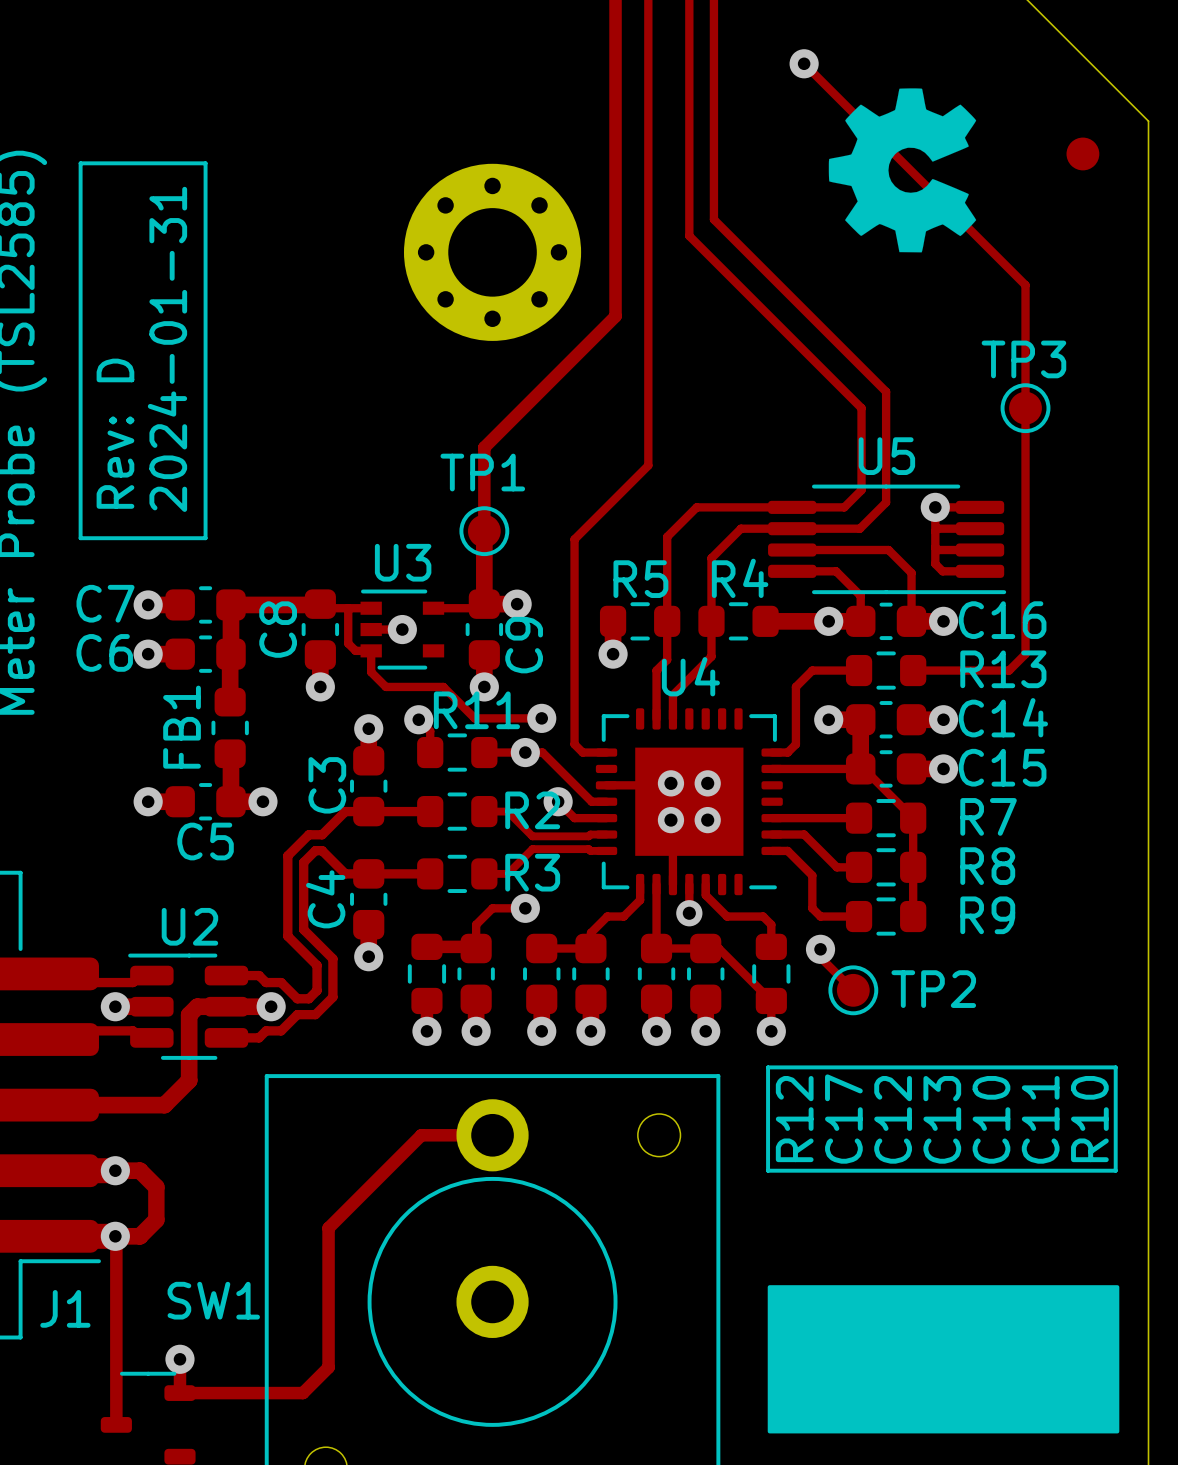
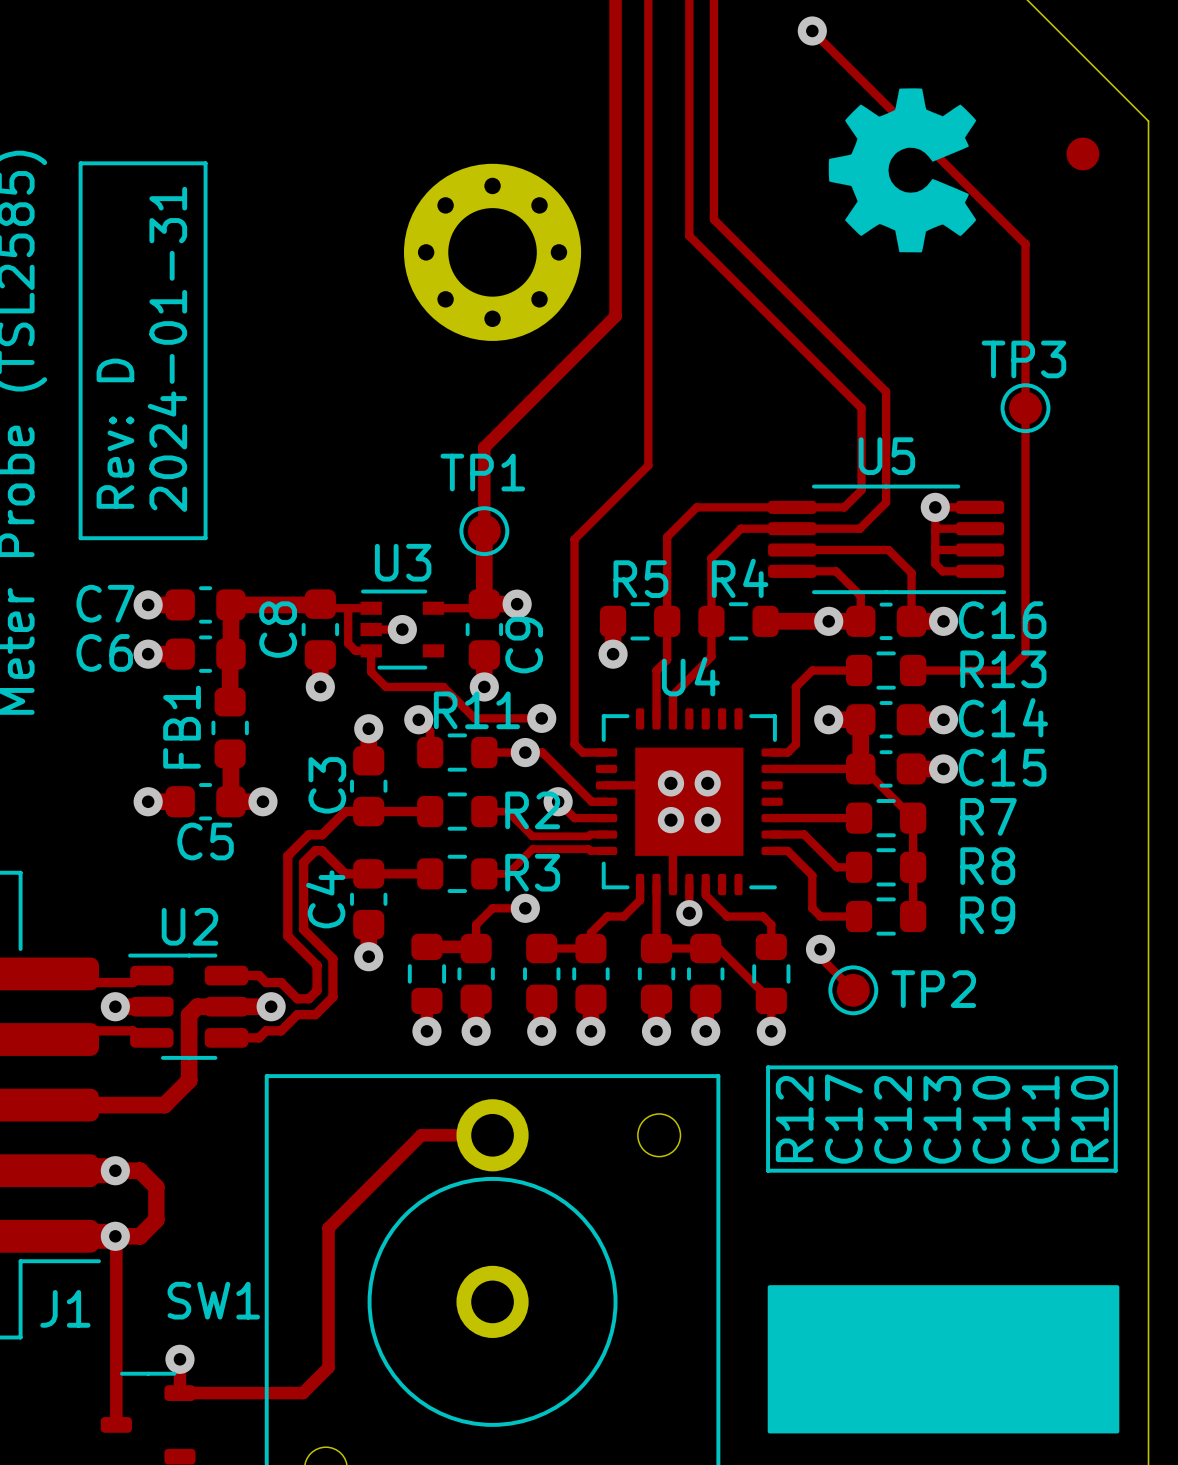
track: (804, 63) (1025, 285) -> (812, 30) (1025, 244) (1025, 285)
via position: (804, 63) -> (812, 30)

